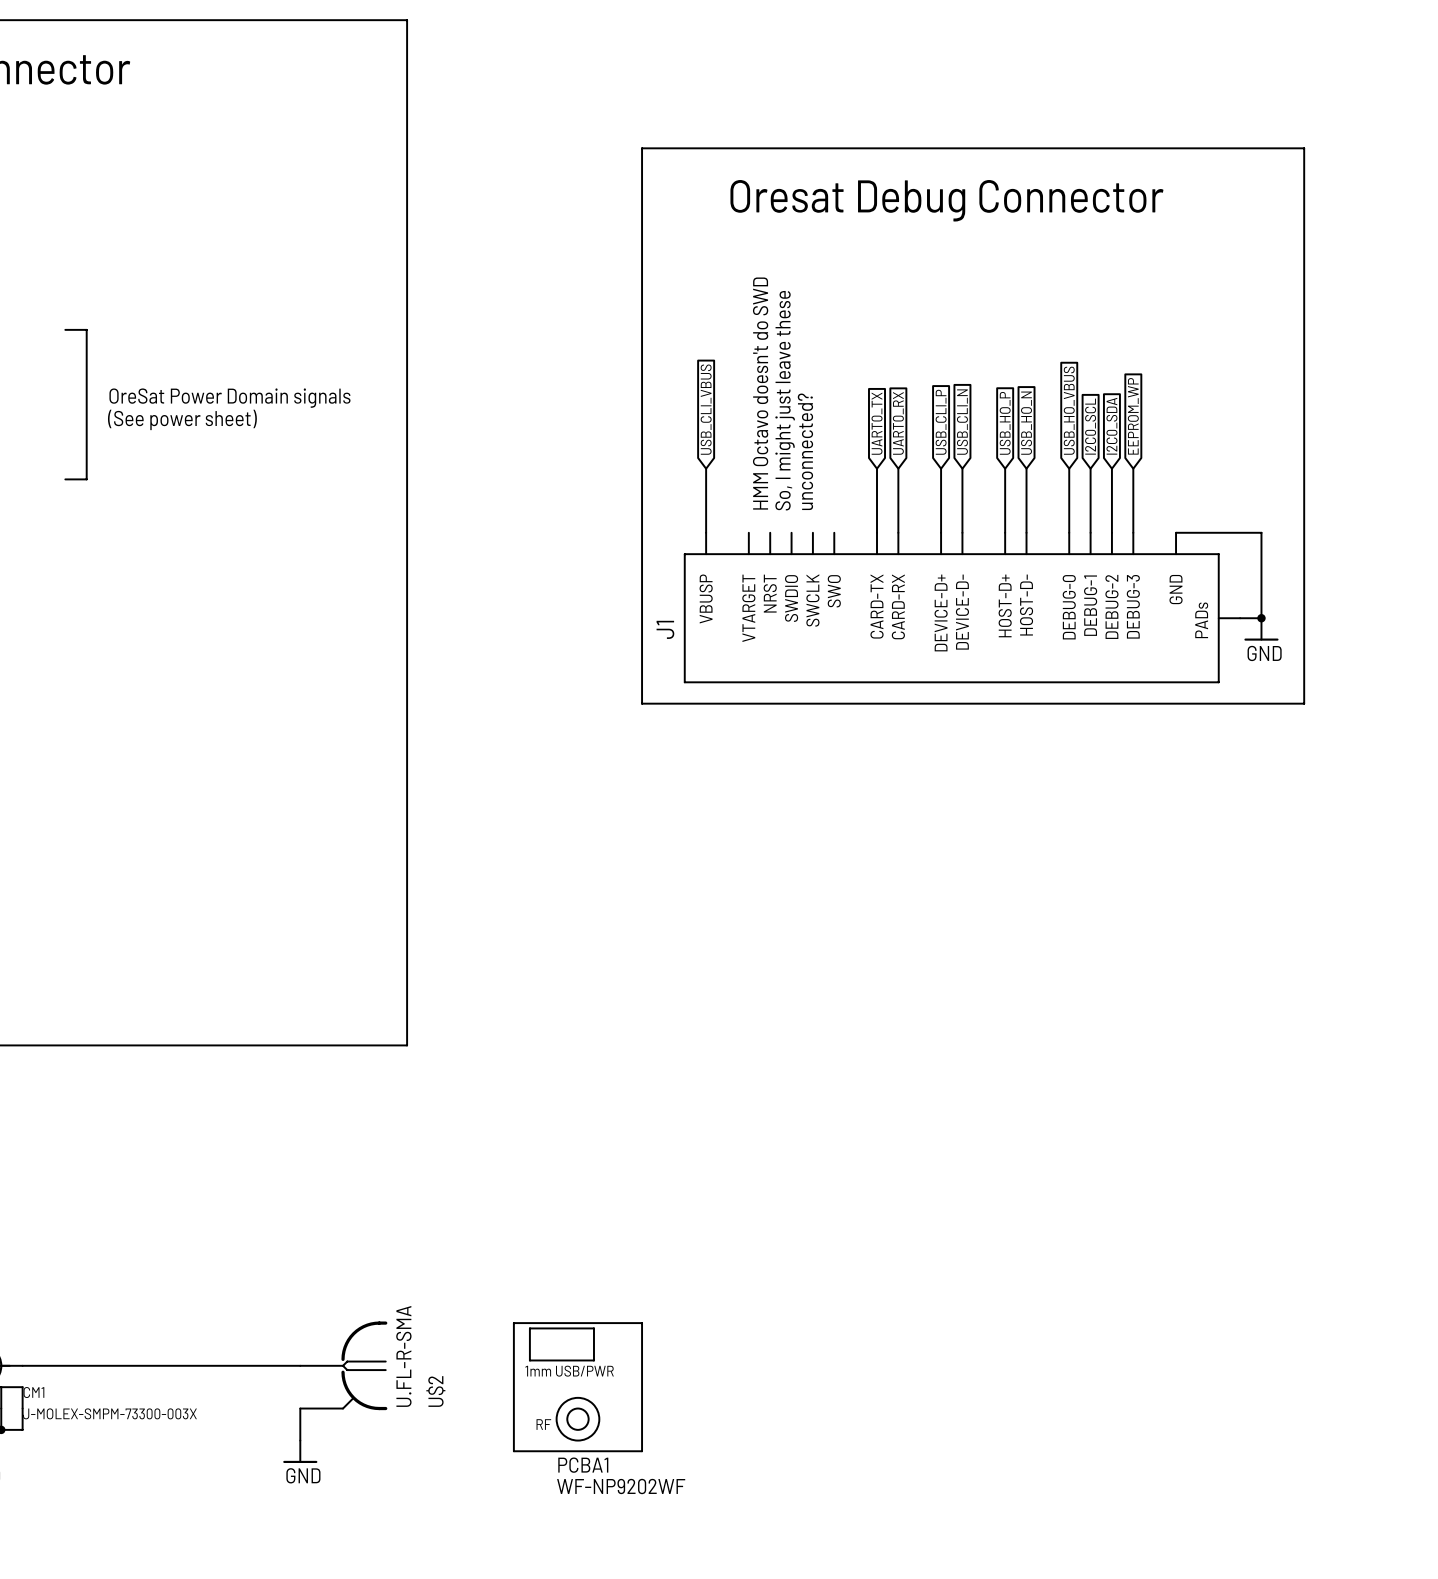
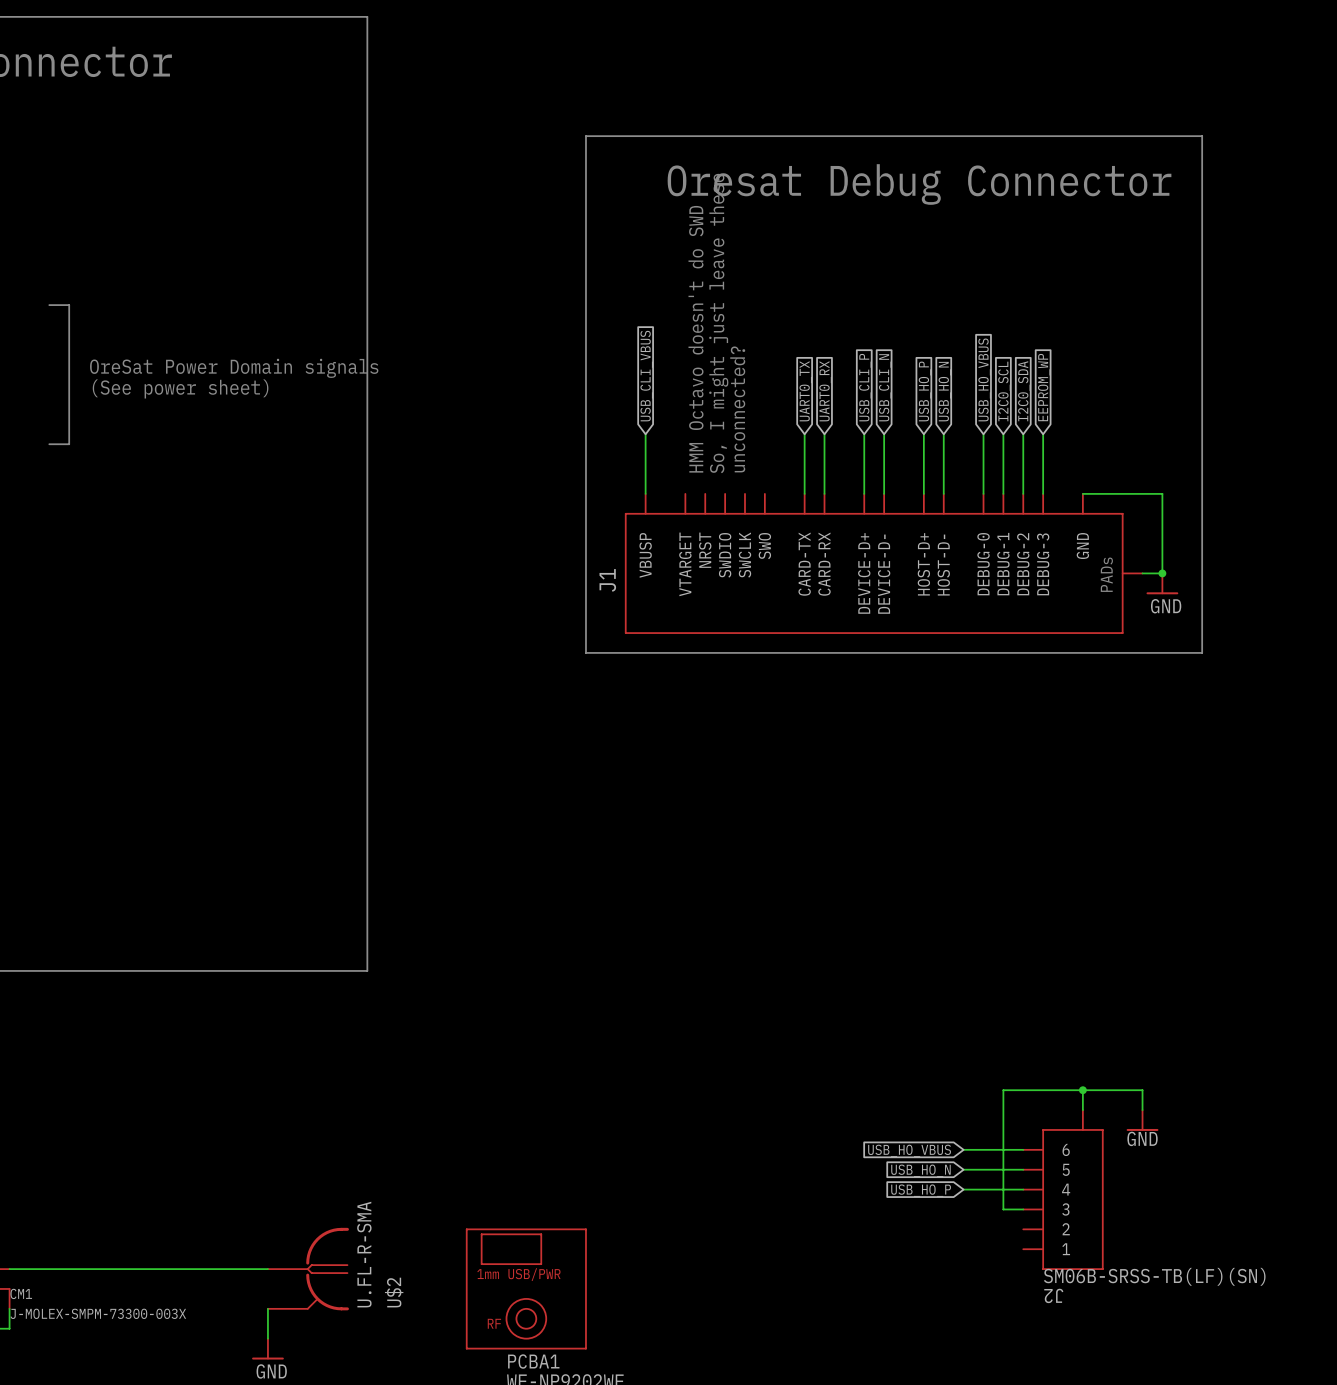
wire: none -> (1082, 1090) (1082, 1110)
junction: none -> (1082, 1090)
wire: none -> (1142, 1110) (1142, 1090) (1003, 1090) (1003, 1209) (1023, 1209)
power symbol: none -> GND (1142, 1120)
global label: none -> USB_HO_VBUS (909, 1150)
wire: none -> (963, 1149) (1023, 1149)
global label: none -> USB_HO_N (920, 1170)
wire: none -> (963, 1169) (1023, 1169)
global label: none -> USB_HO_P (921, 1190)
wire: none -> (963, 1189) (1023, 1189)
J2: none -> SM06B-SRSS-TB(LF)(SN) (1063, 1189)

